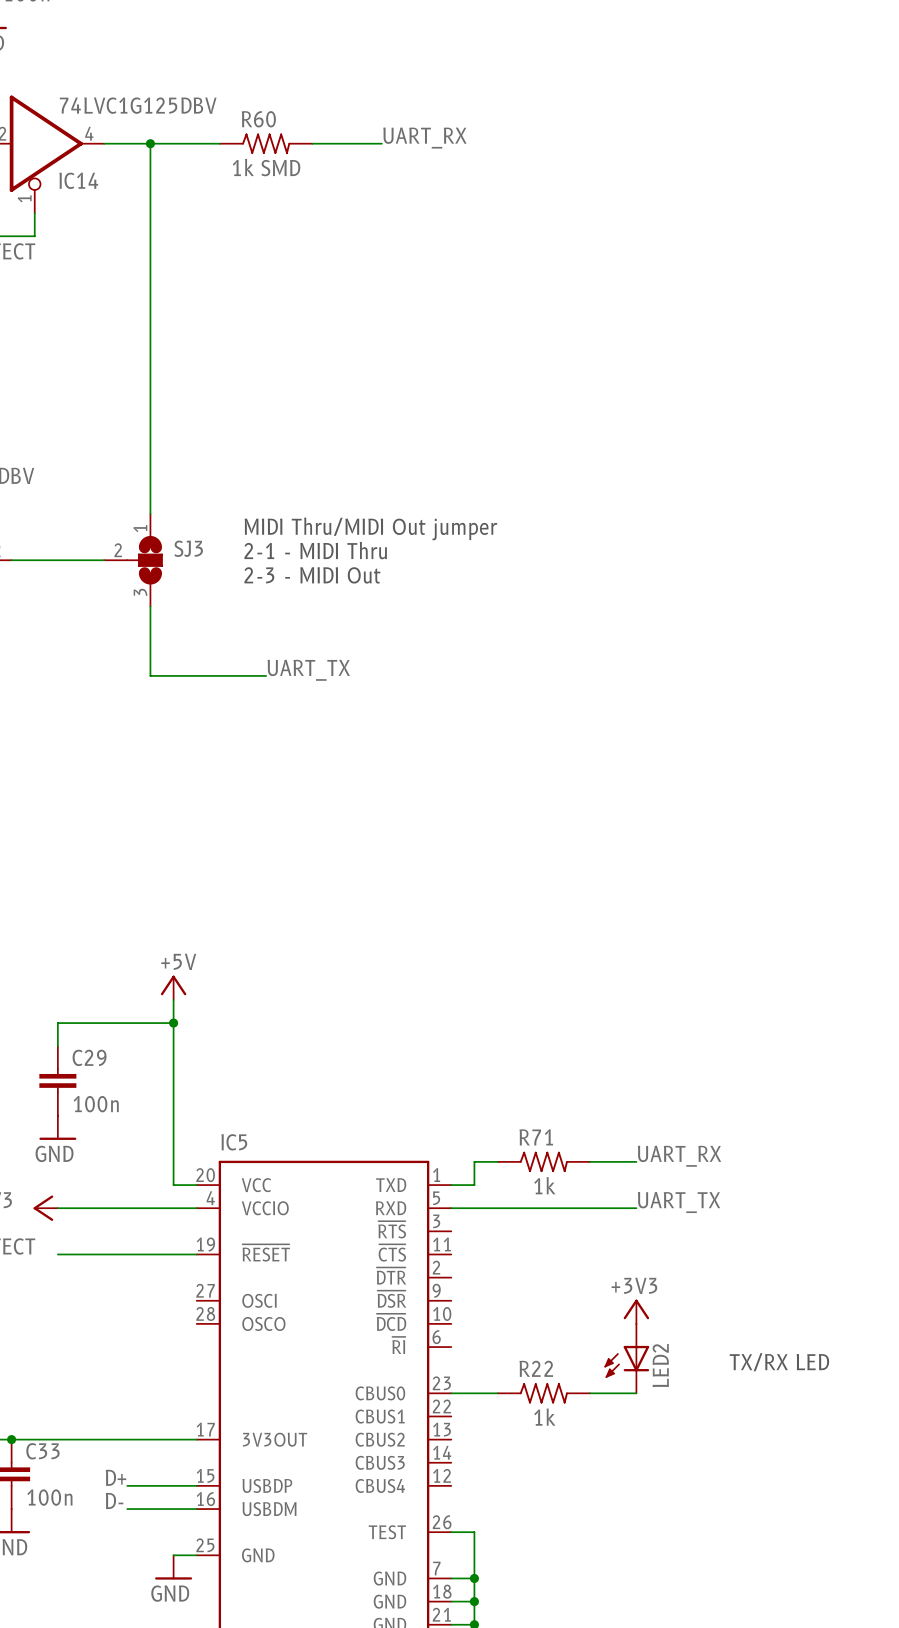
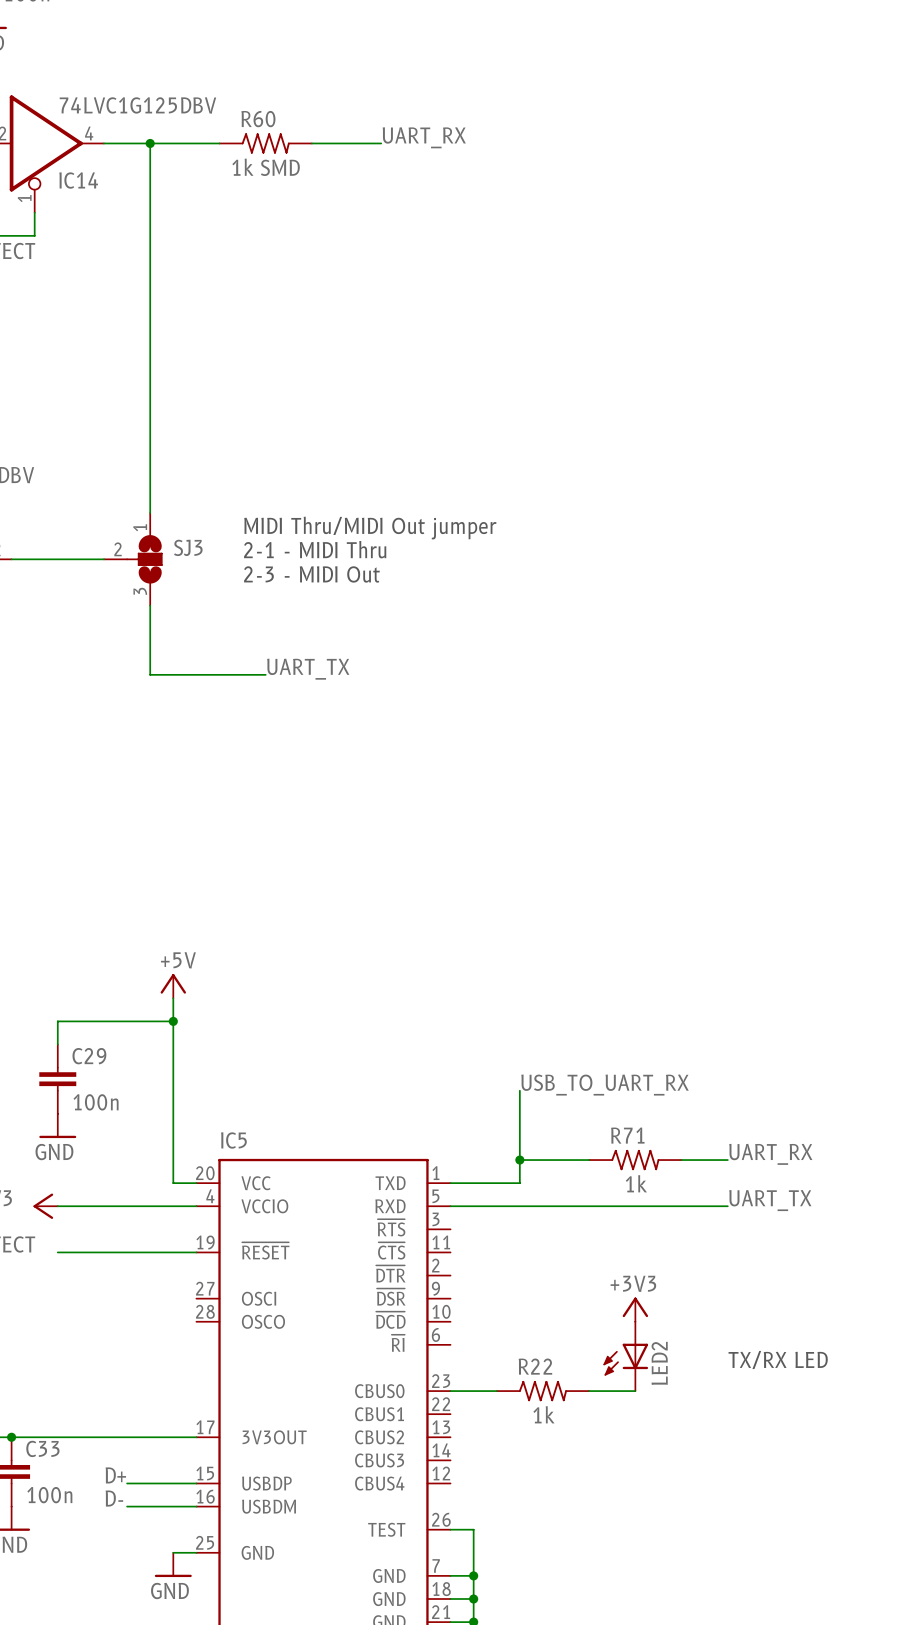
label: none -> USB_TO_UART_RX (605, 1085)
label position: UART_RX (679, 1156) -> UART_RX (770, 1154)
wire: (497, 1161) (474, 1161) (474, 1185) -> (519, 1090) (519, 1183) (473, 1183)
junction: none -> (519, 1160)
R71 position: (543, 1161) -> (635, 1160)
wire: none -> (681, 1160) (727, 1160)
label position: UART_TX (679, 1202) -> UART_TX (770, 1200)
wire: none -> (635, 1206) (727, 1206)

